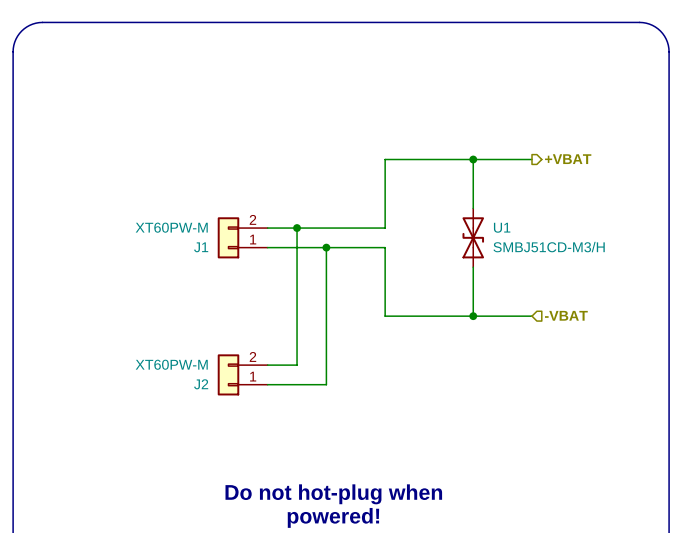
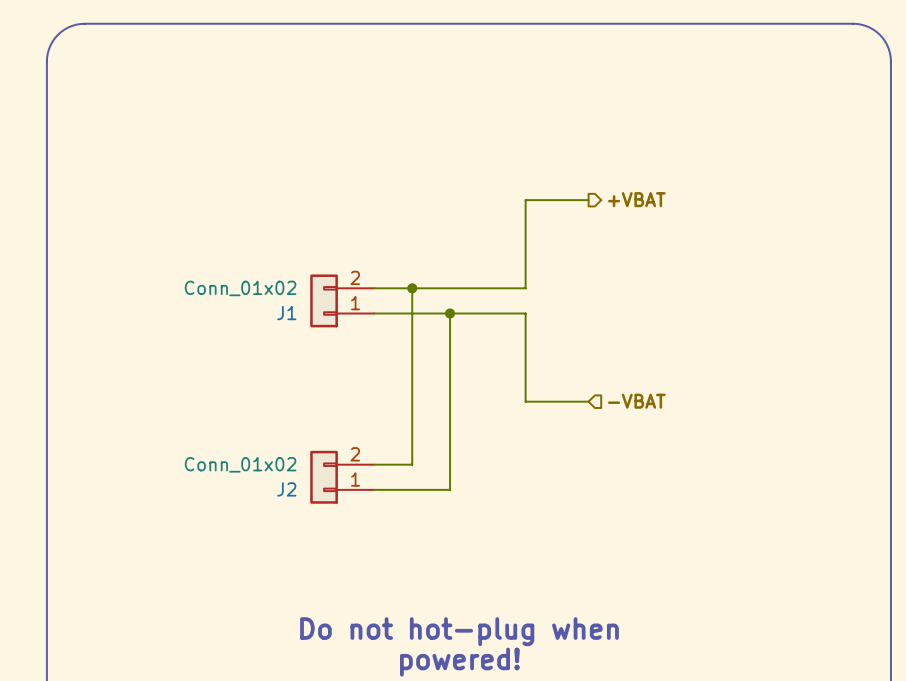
wire: (434, 159) (532, 159) -> none
wire: (473, 159) (473, 208) -> none
junction: (473, 159) -> none
hierarchical label position: +VBAT (568, 159) -> +VBAT (636, 199)
J1 value: XT60PW-M (171, 227) -> Conn_01x02 (240, 288)
U1: SMBJ51CD-M3/H (473, 237) -> none
wire: (473, 267) (473, 316) -> none
hierarchical label position: -VBAT (566, 315) -> -VBAT (636, 401)
wire: (434, 316) (532, 316) -> none
junction: (473, 316) -> none
J2 value: XT60PW-M (171, 364) -> Conn_01x02 (240, 464)

